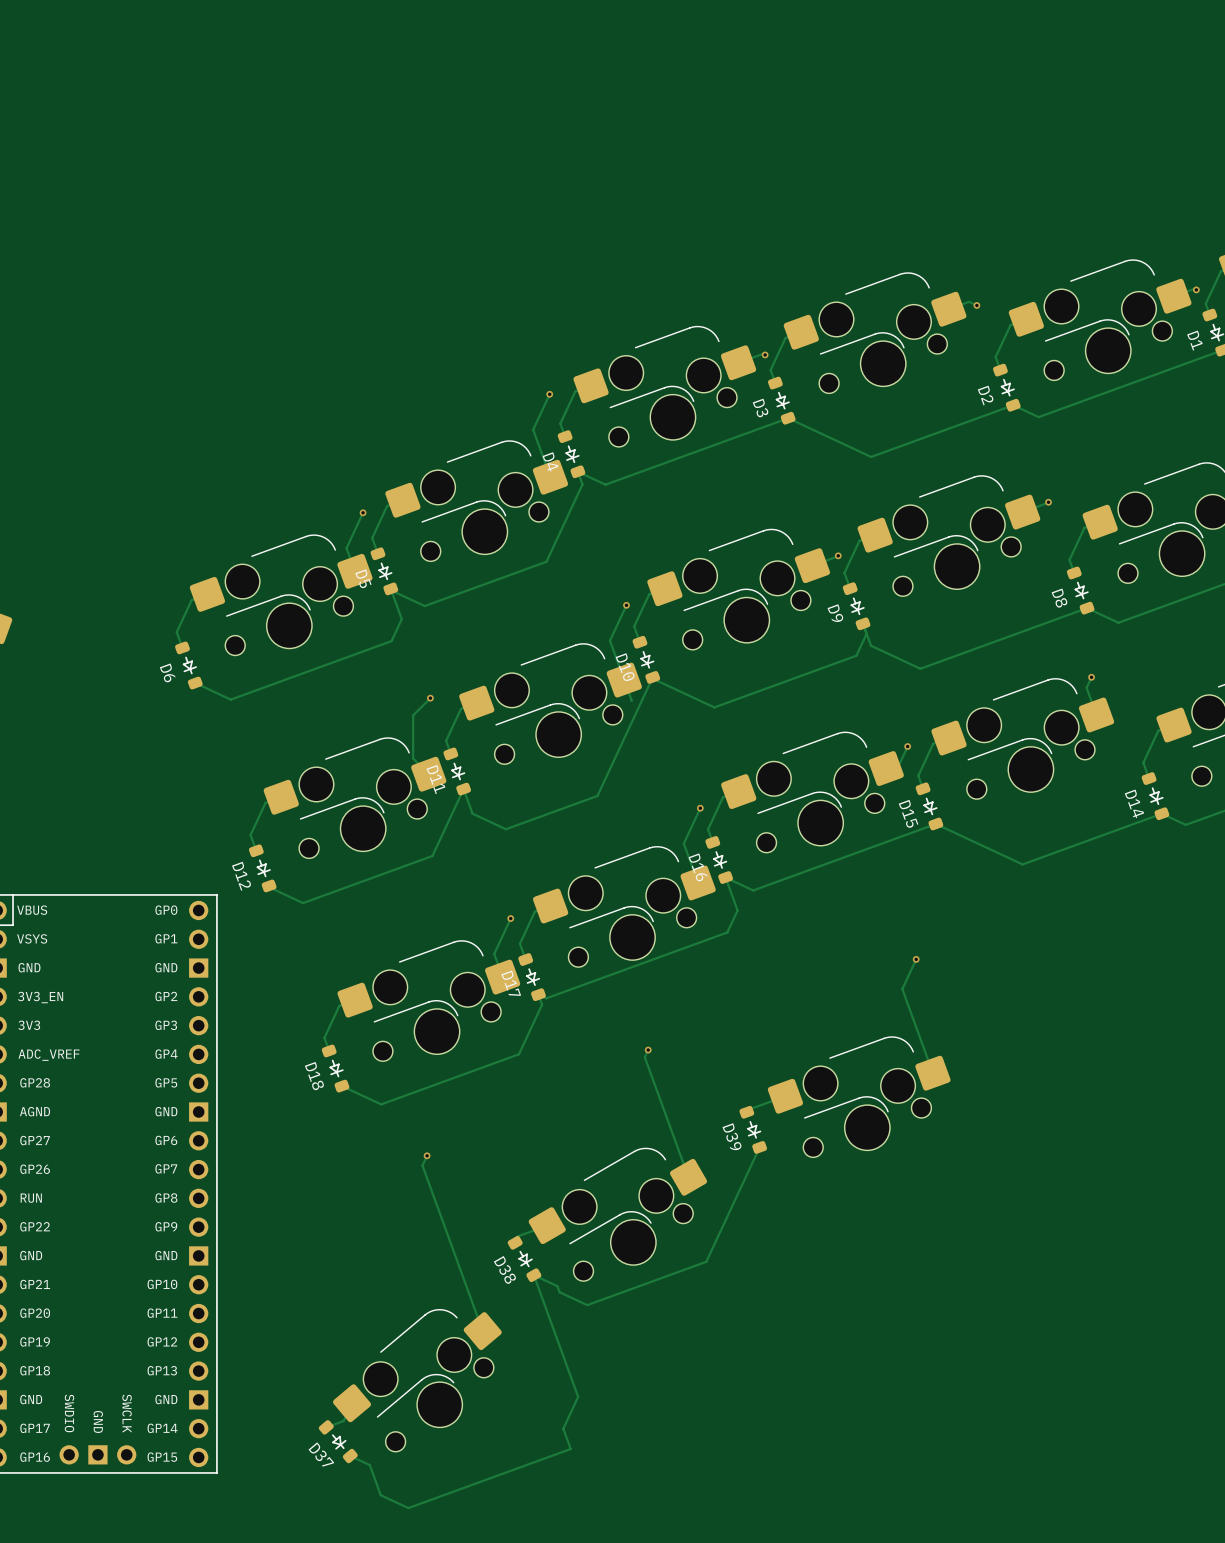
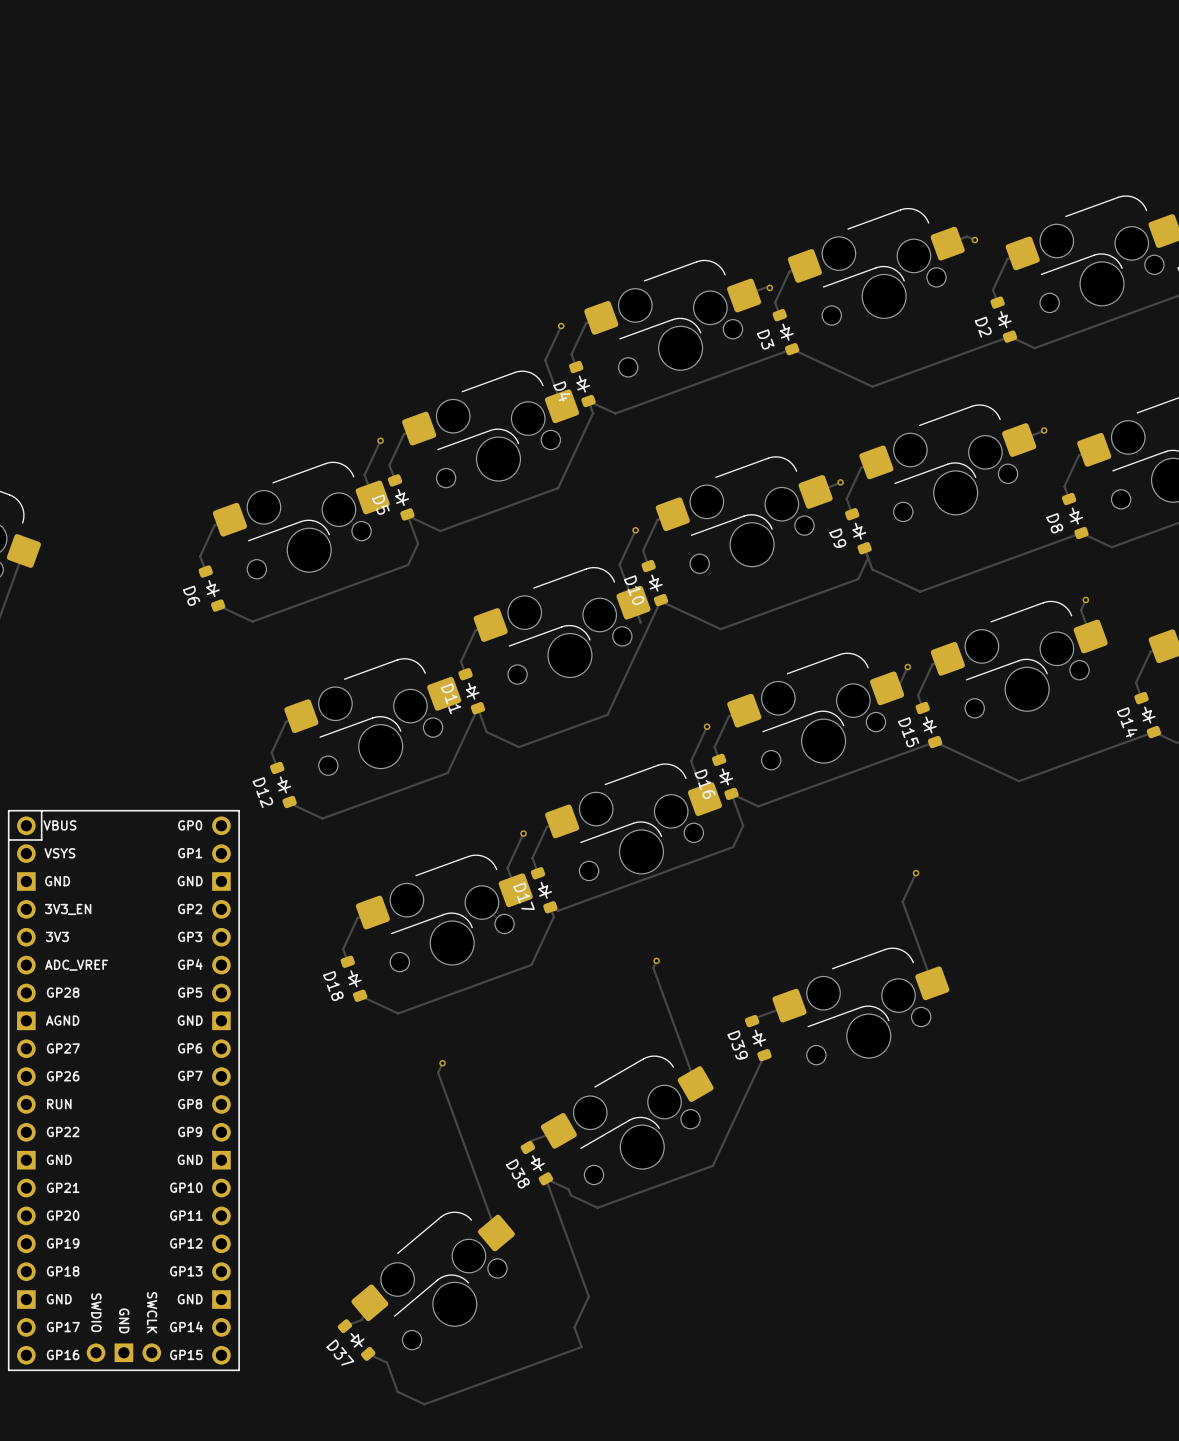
track: (430, 698) (413, 715) (413, 758) (428, 774) -> none
via: (430, 698) -> none

